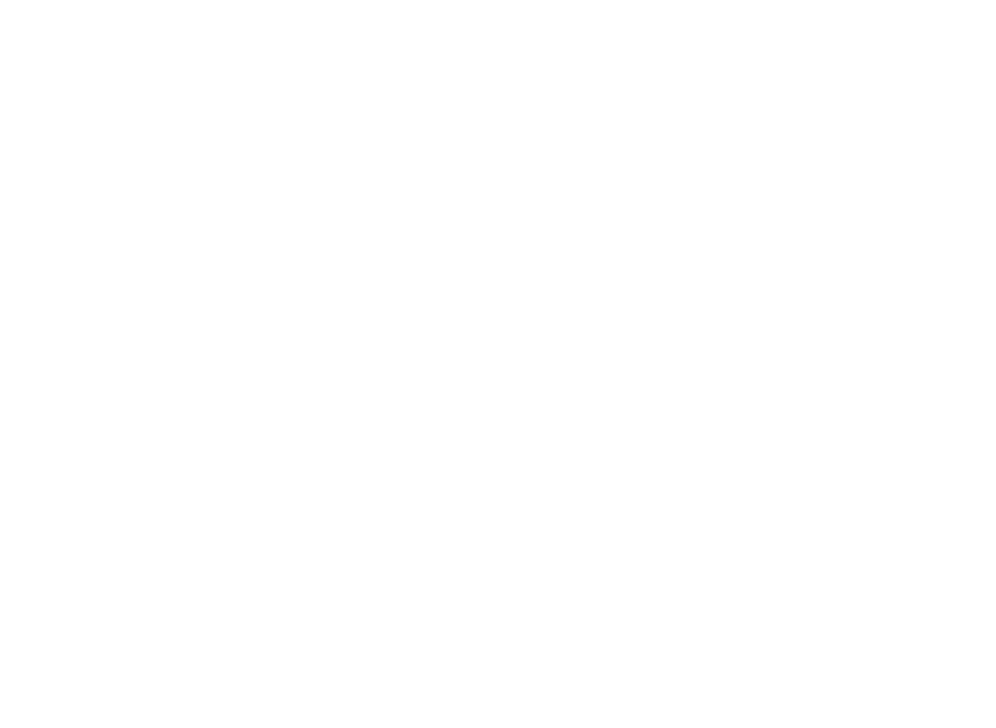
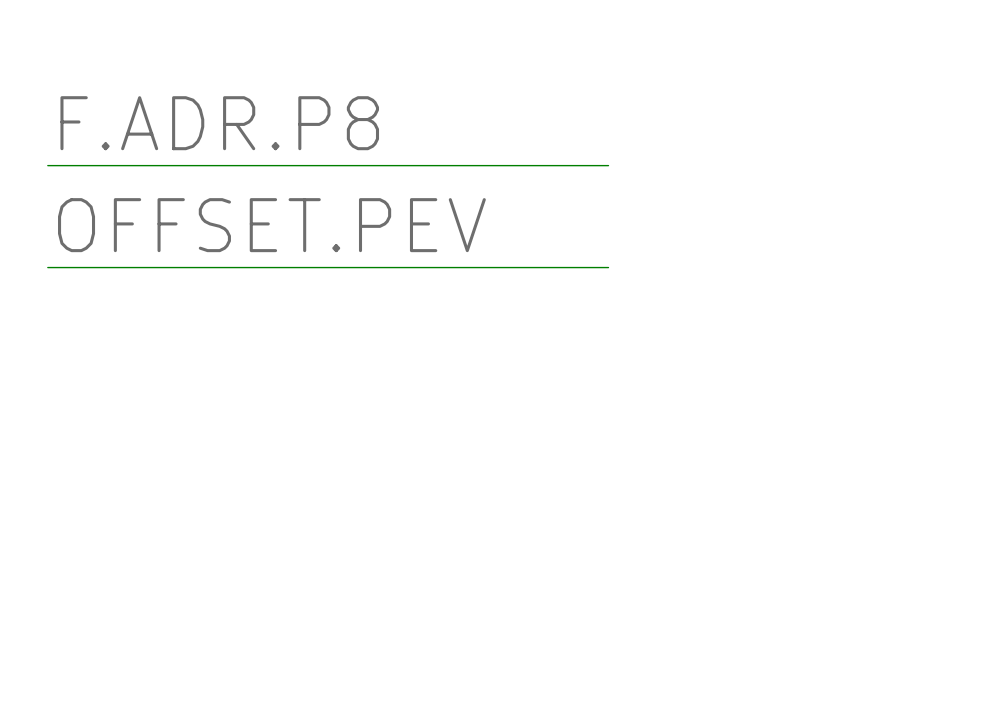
label: none -> F.ADR.P8 (219, 123)
wire: none -> (47, 165) (608, 165)
label: none -> OFFSET.PEV (271, 225)
wire: none -> (47, 267) (608, 267)

